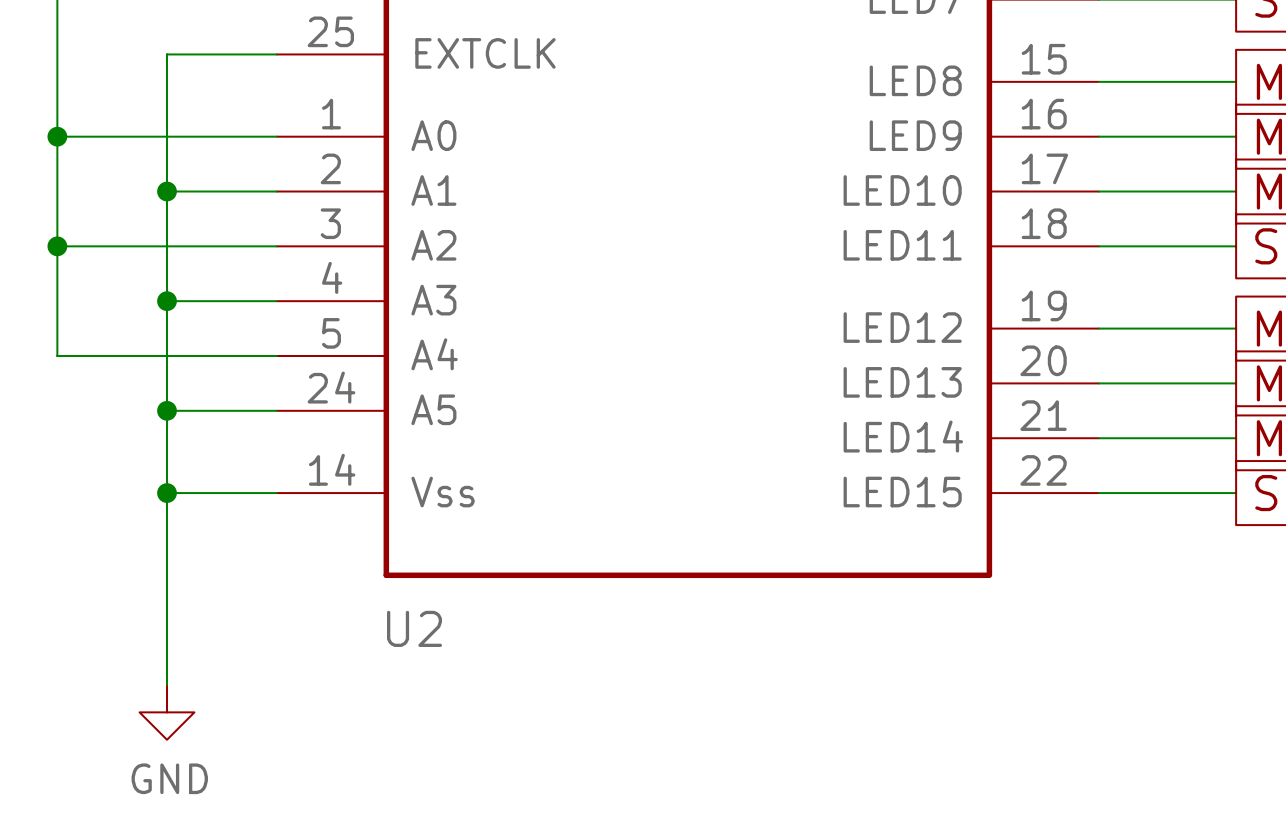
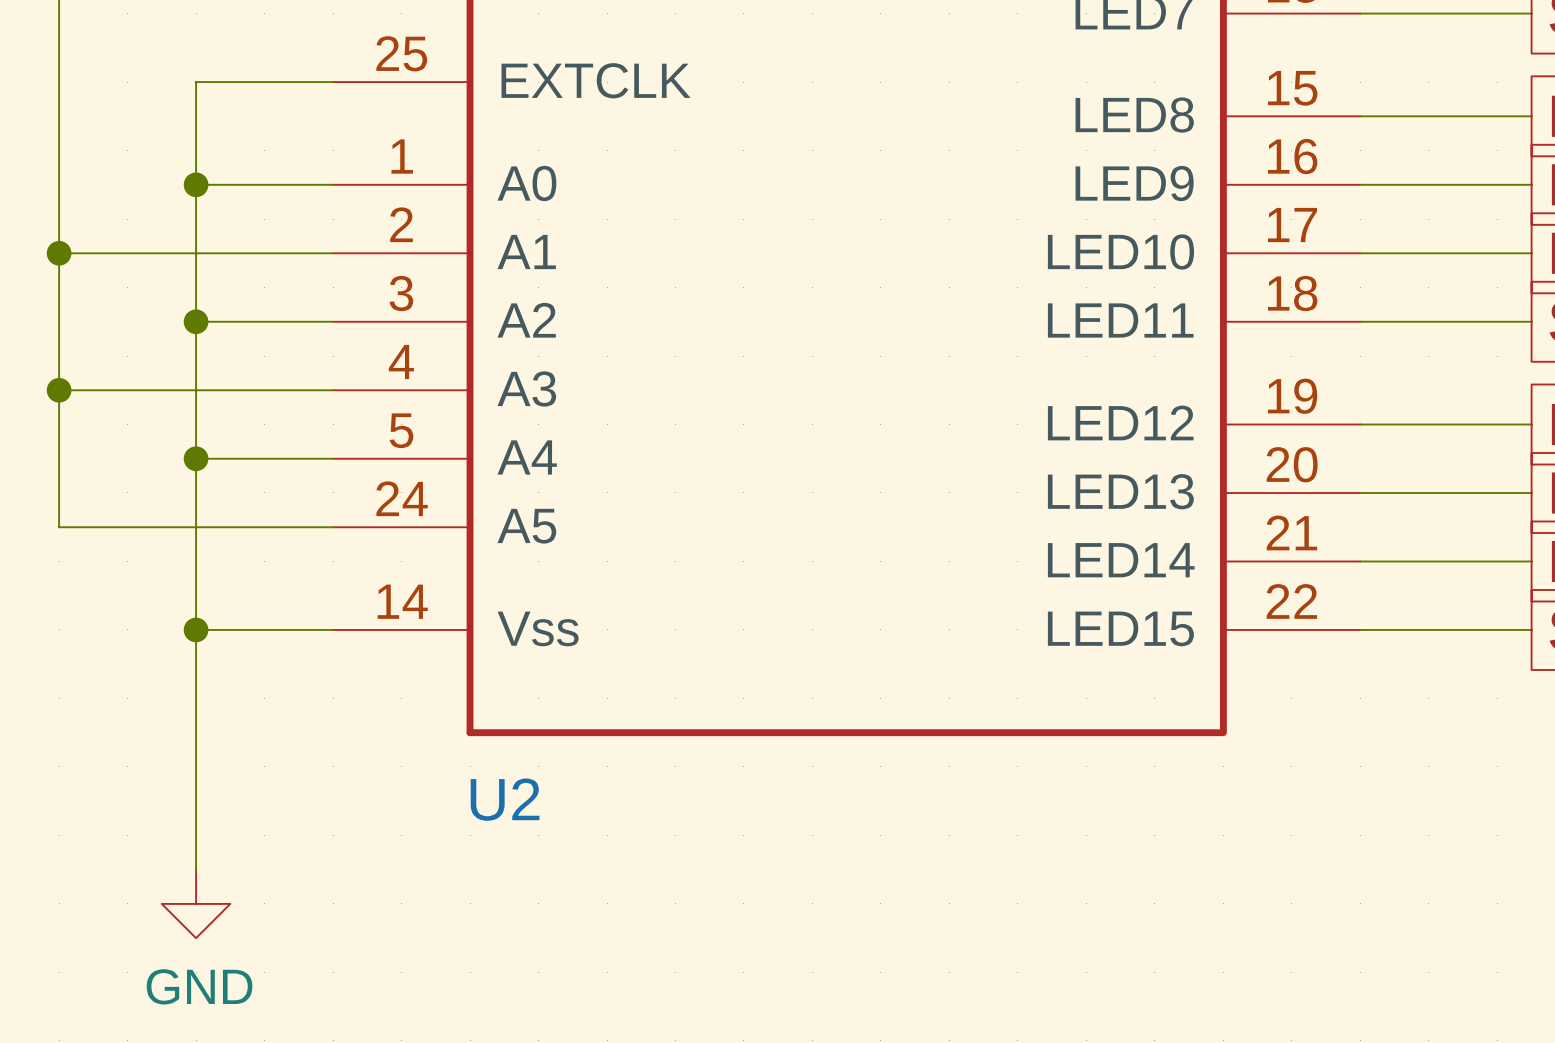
wire: (57, 136) (167, 136) -> (59, 253) (196, 253)
junction: (57, 136) -> none
junction: none -> (196, 184)
junction: none -> (59, 253)
junction: (167, 191) -> none
wire: (57, 246) (167, 246) -> (59, 390) (196, 390)
junction: (57, 246) -> none
junction: none -> (196, 321)
junction: none -> (59, 390)
junction: (167, 301) -> none
wire: (57, 355) (167, 355) -> (59, 458) (59, 527) (196, 527)
junction: none -> (196, 458)
junction: (167, 410) -> none

